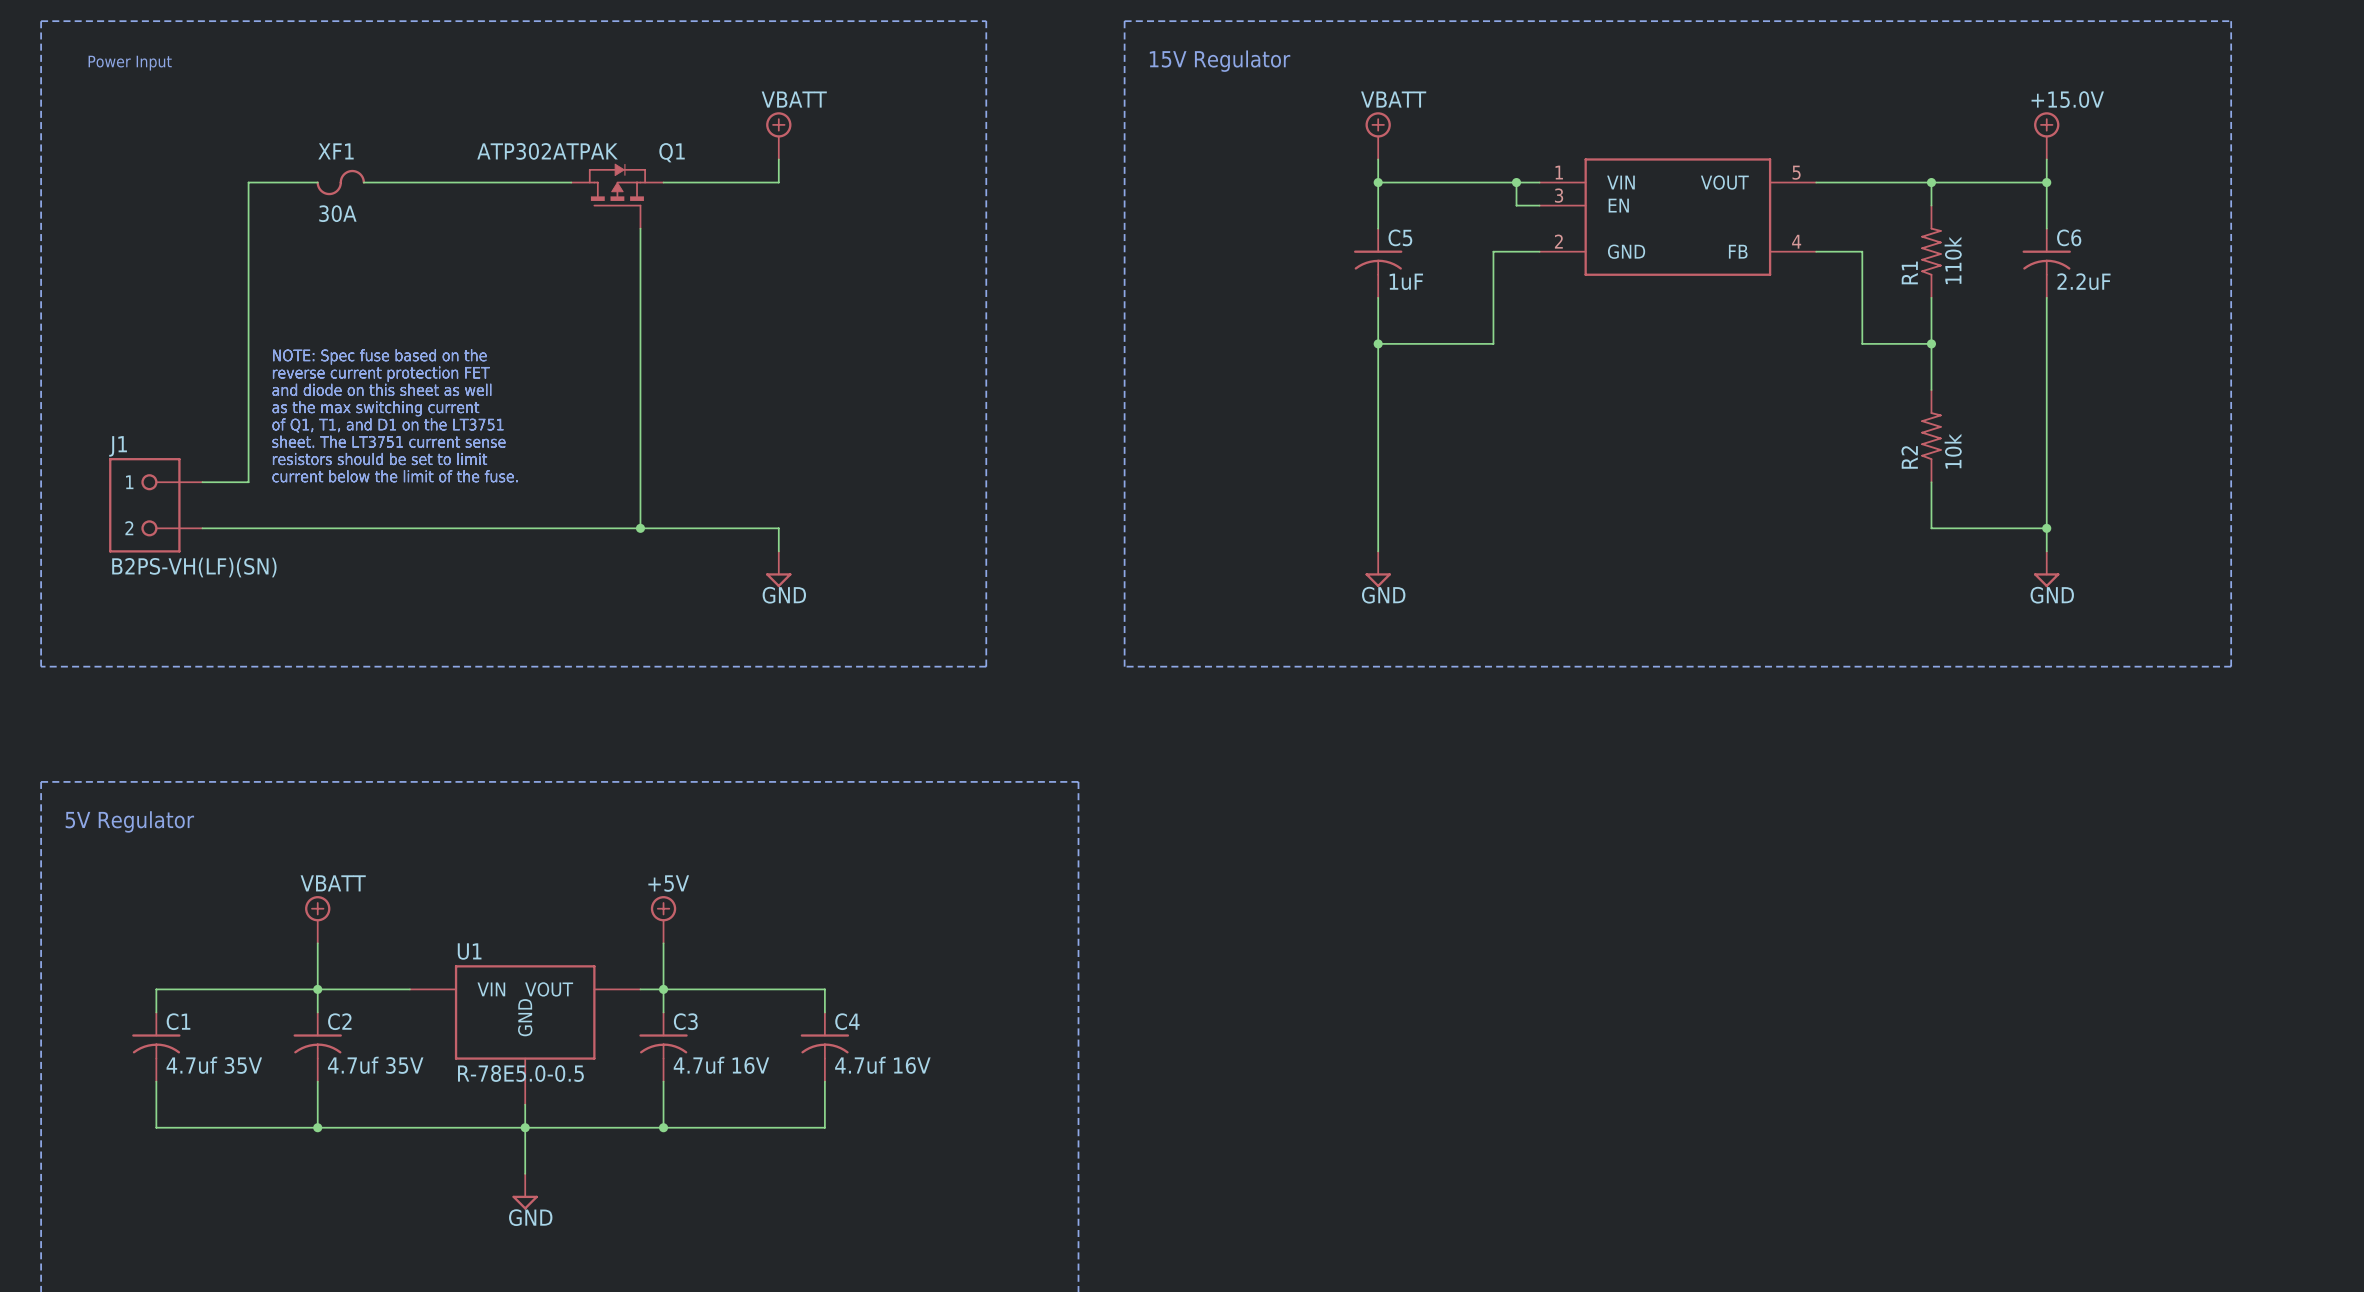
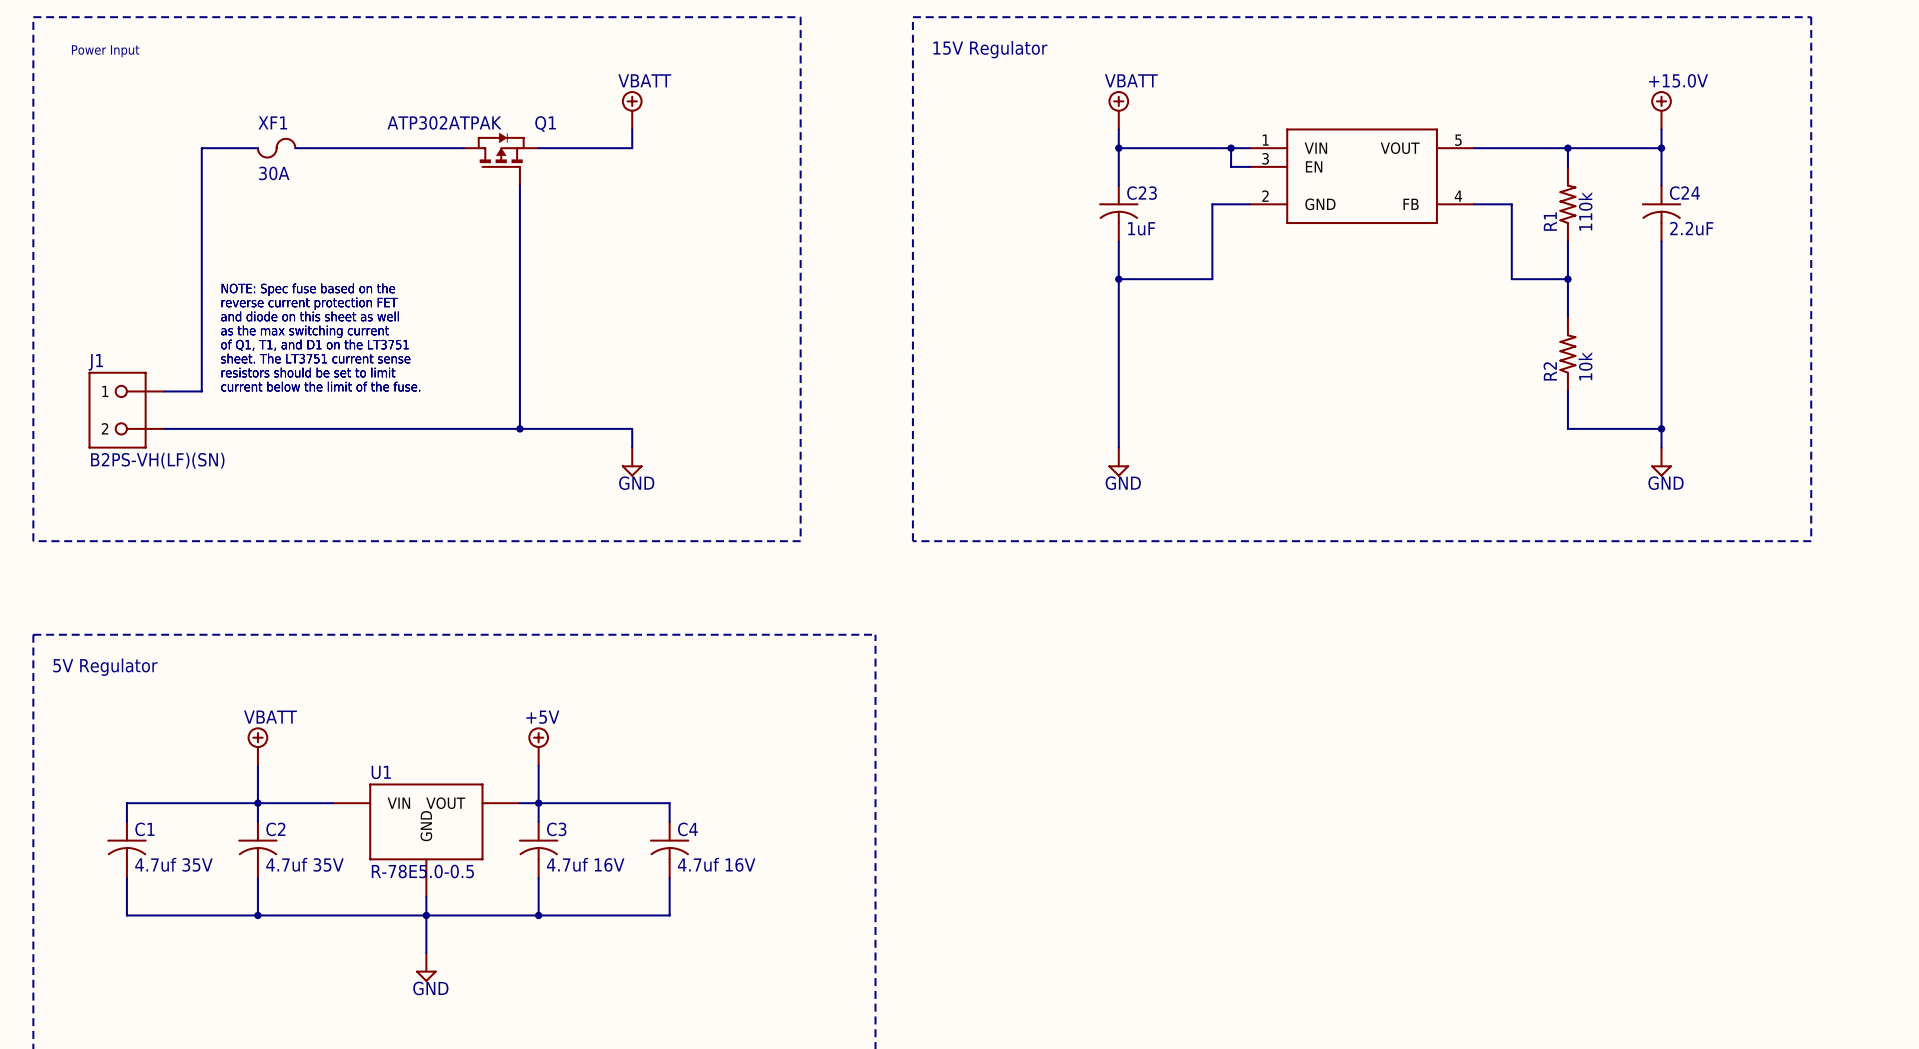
C5 name: C5 (1400, 237) -> C23 (1142, 193)
C6 name: C6 (2069, 237) -> C24 (1684, 193)

